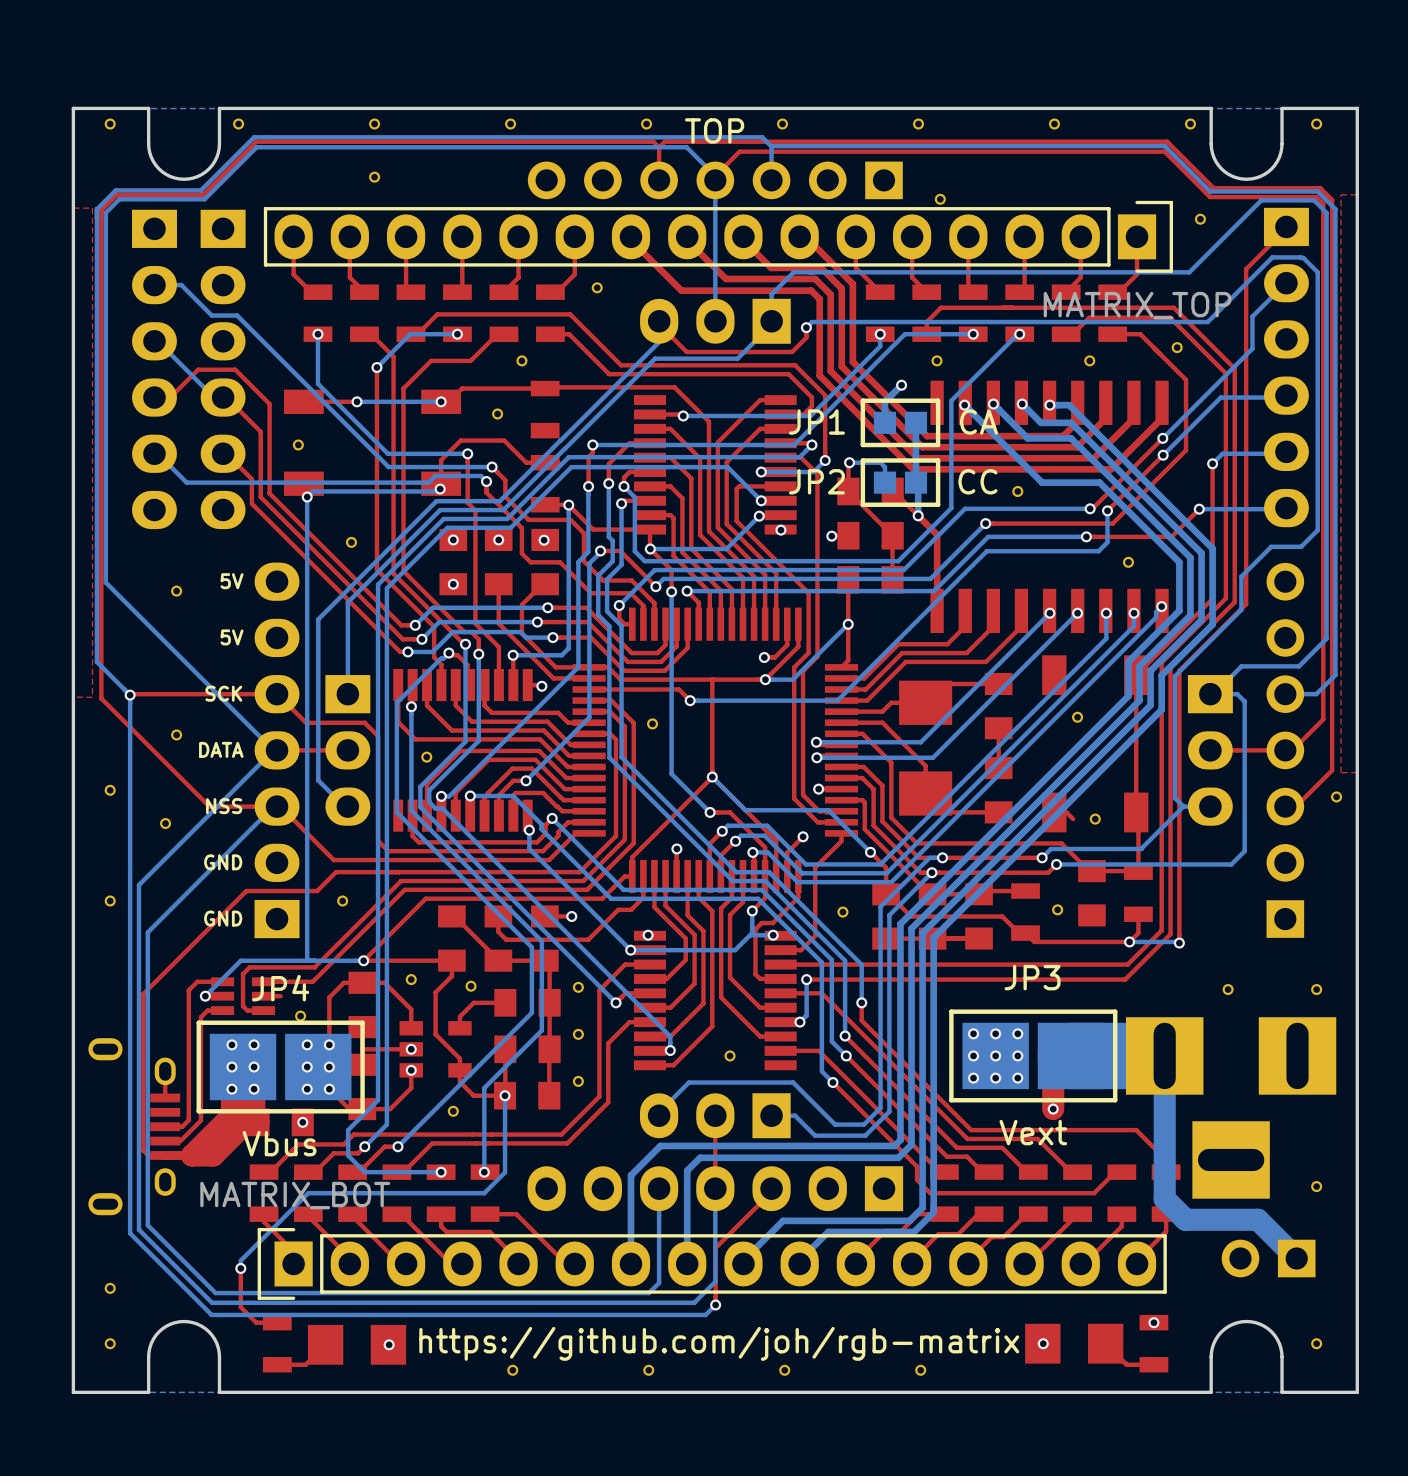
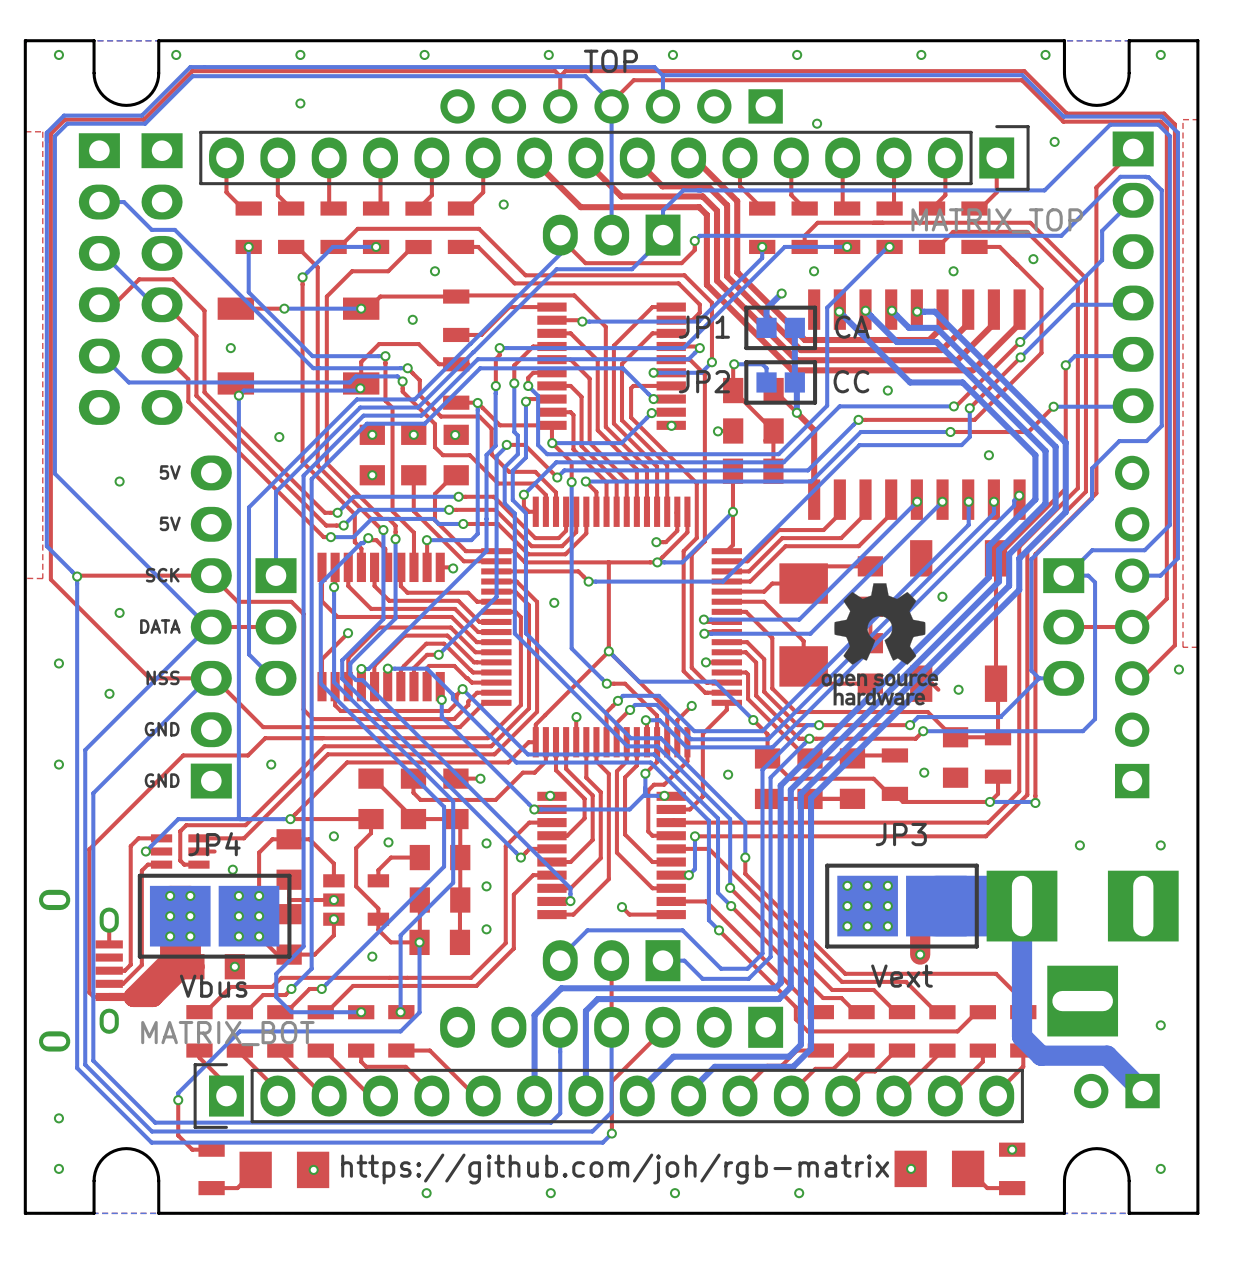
top track: none -> (551, 307) (509, 307) (481, 334) (456, 334)
drawing: none -> [821, 583, 939, 706]
top track: none -> (348, 633) (321, 659) (321, 686)
part: (730, 1055) -> none
top track: none -> (621, 907) (629, 914) (671, 914)
via: none -> (621, 907)

